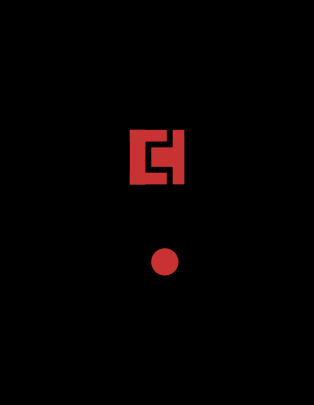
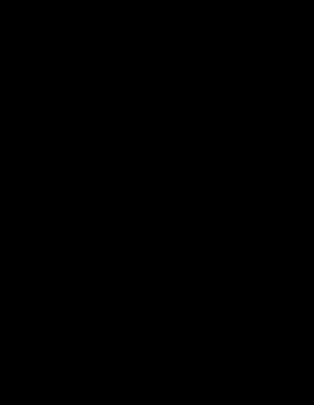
part: (157, 157) -> none
part: (164, 261) -> none

